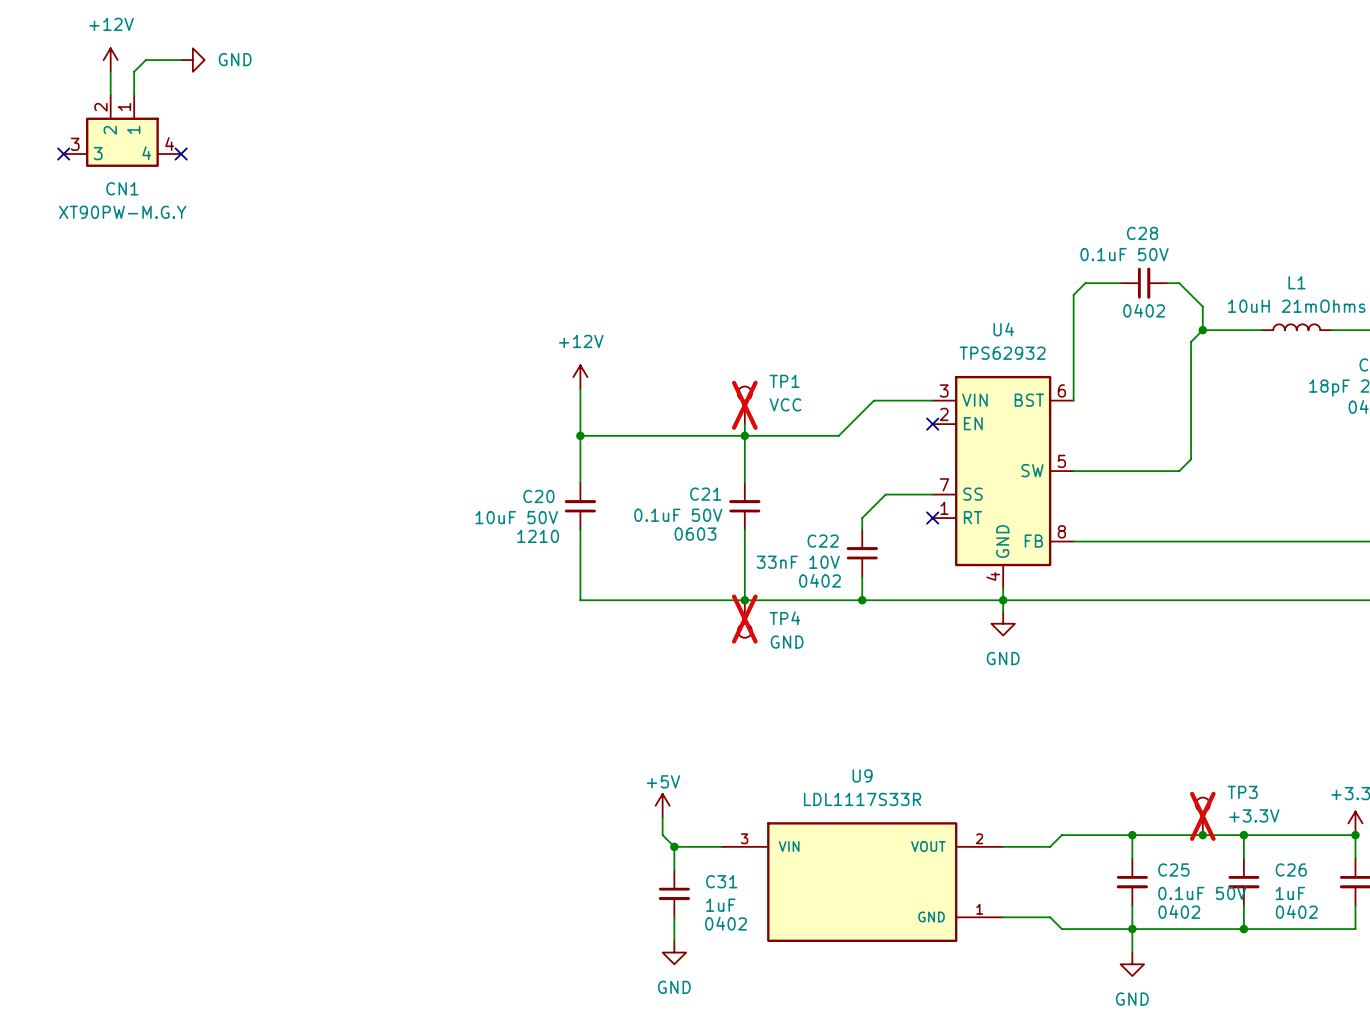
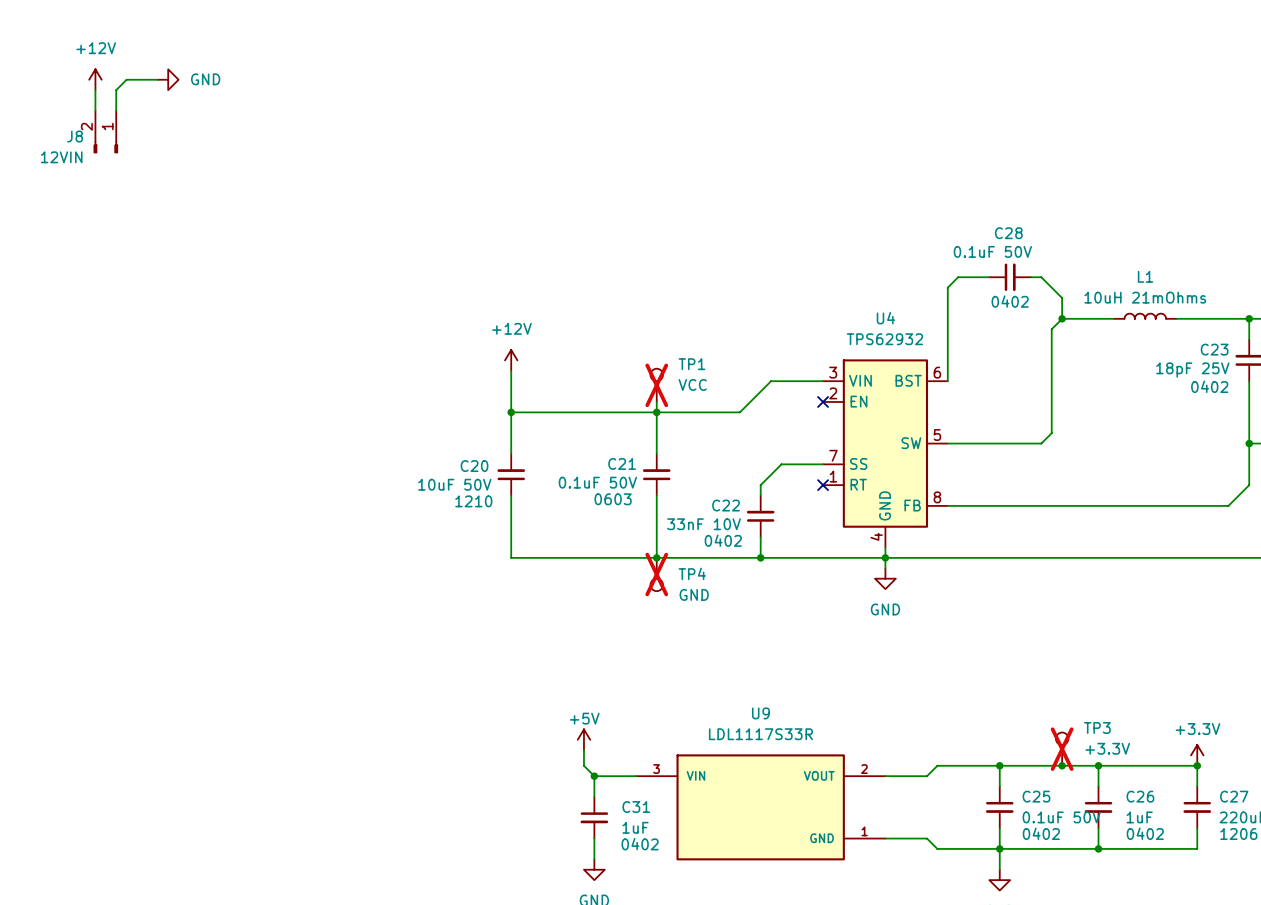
J8: none -> 12VIN (105, 132)
CN1: XT90PW-M.G.Y (122, 131) -> none
no-connect mark: (63, 154) -> none
no-connect mark: (181, 154) -> none

